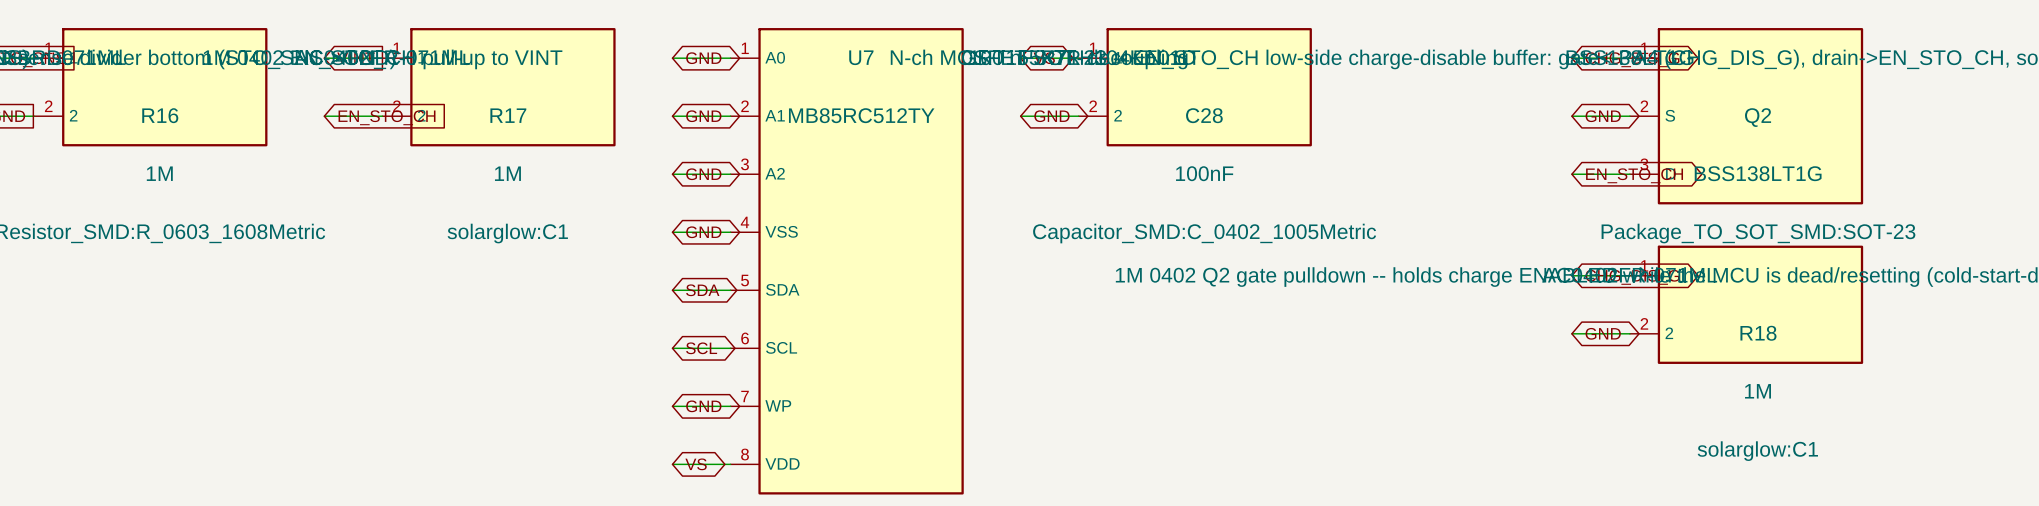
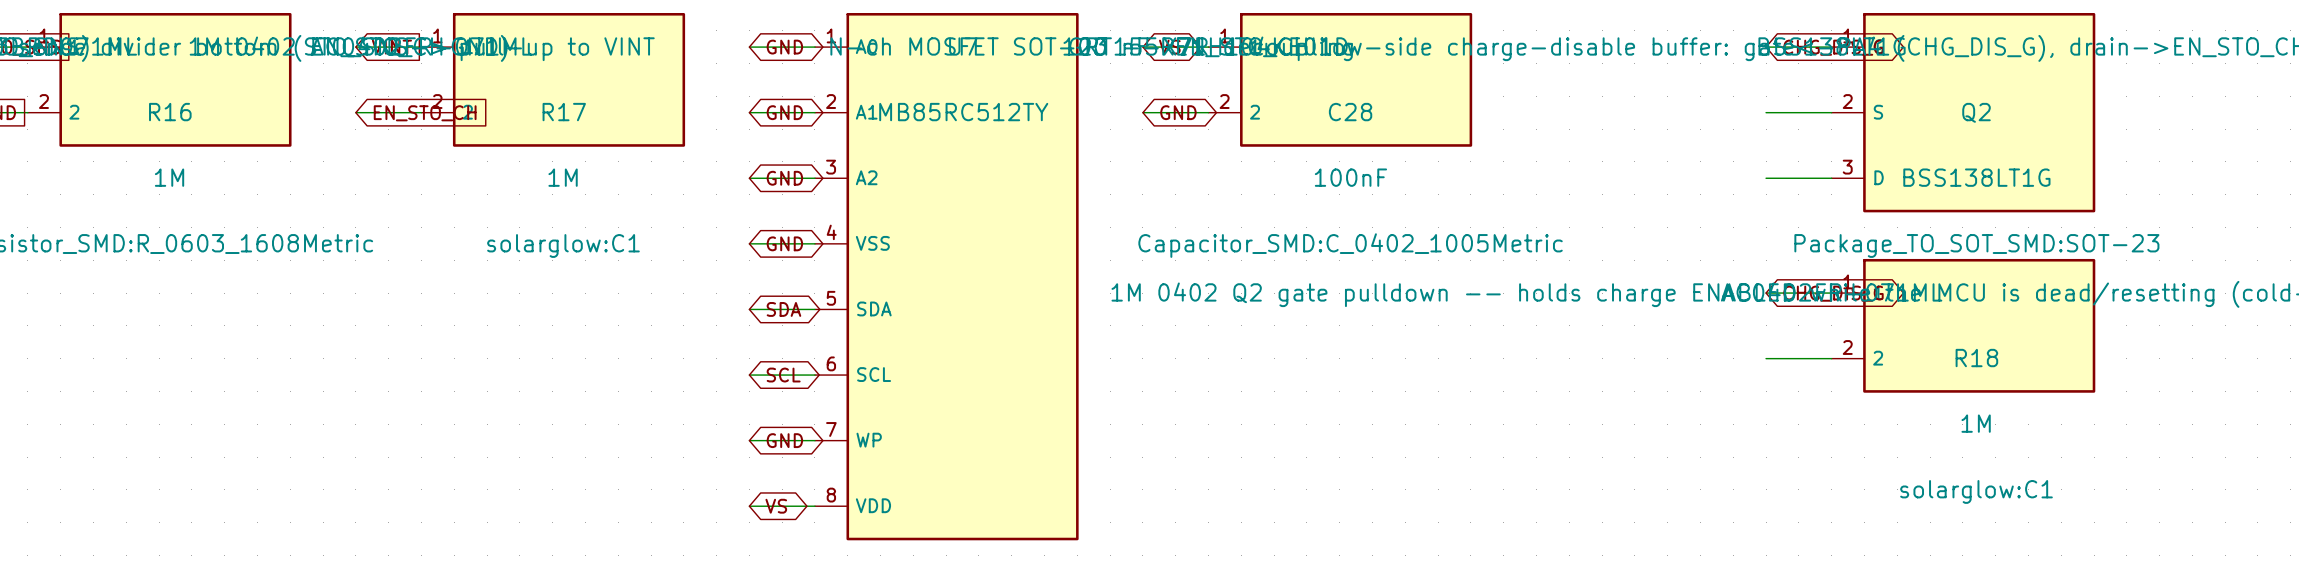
global label: GND (1603, 116) -> none
global label: EN_STO_CH (1634, 175) -> none
global label: GND (1603, 333) -> none

